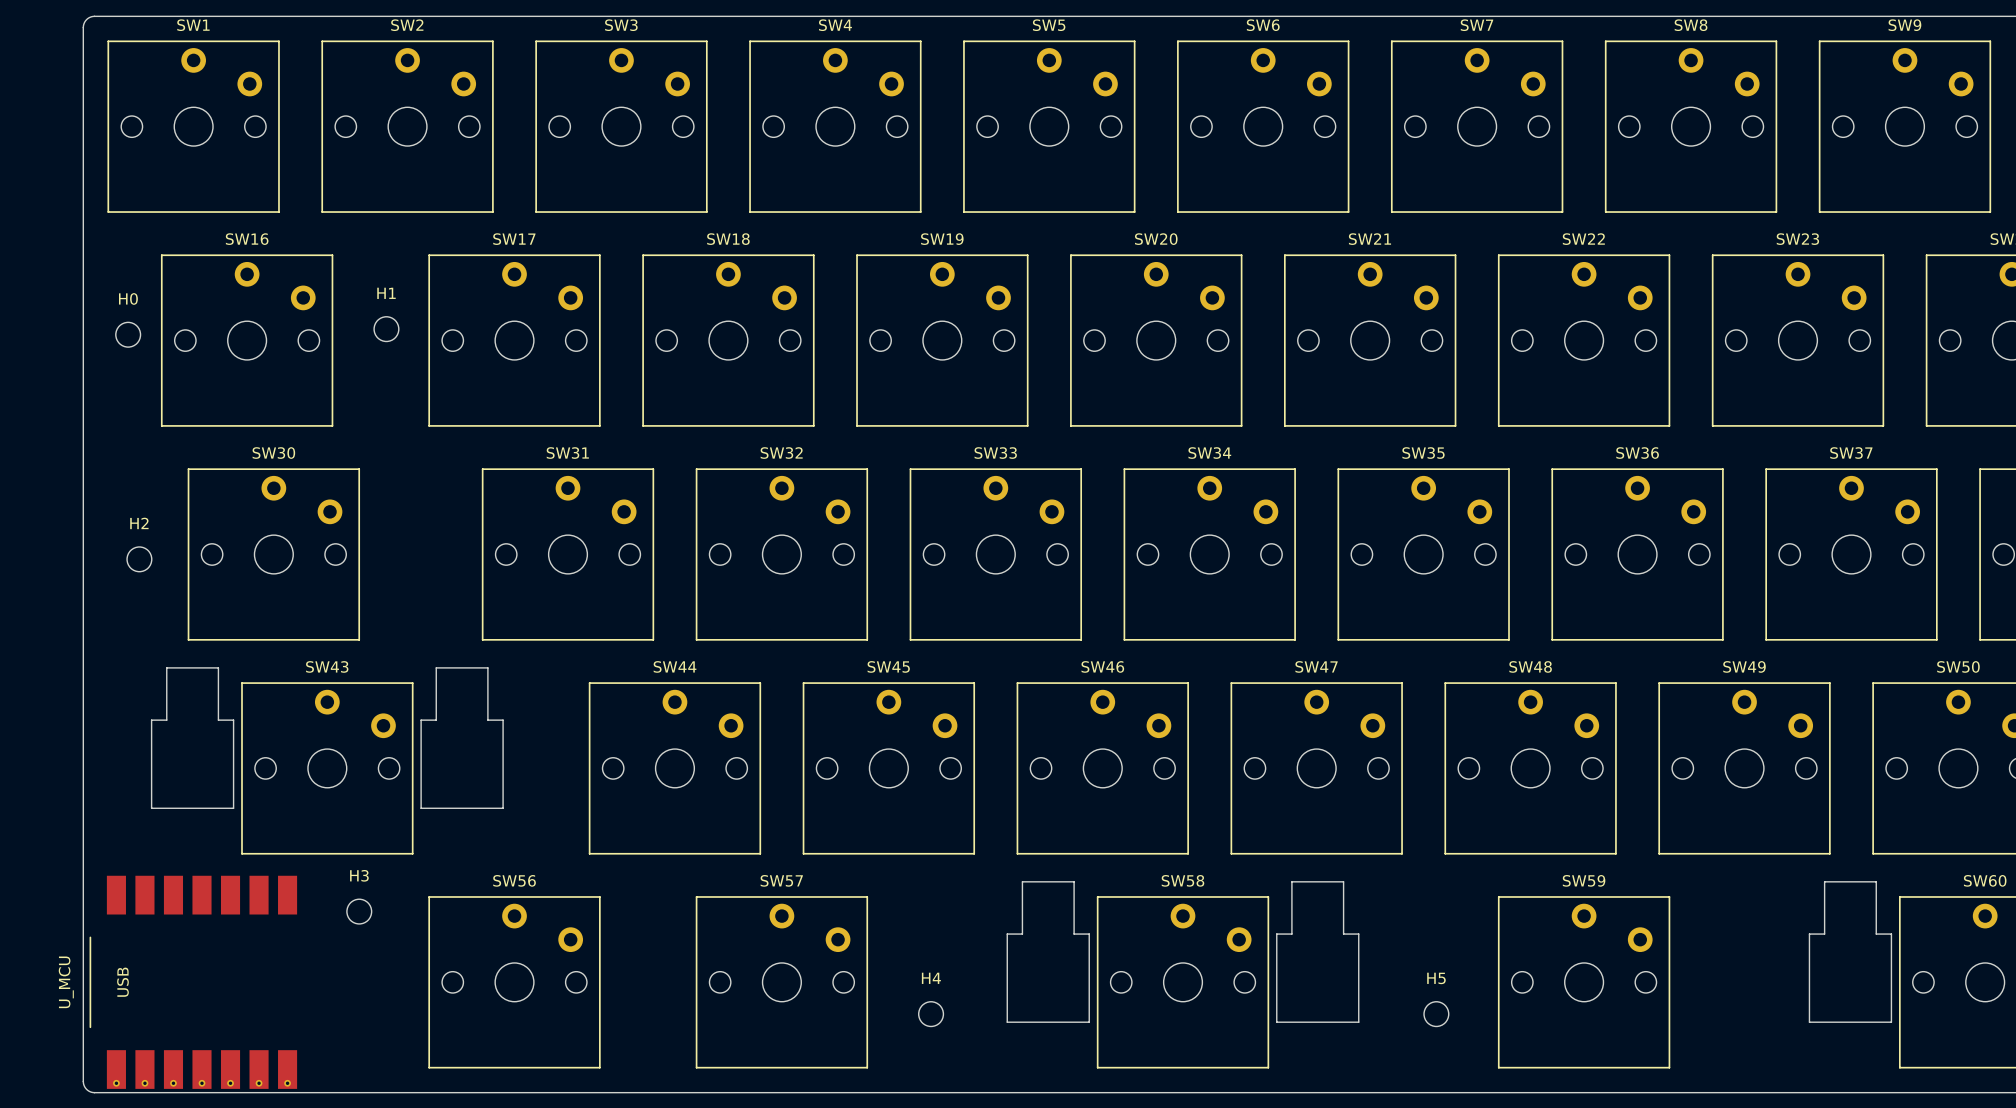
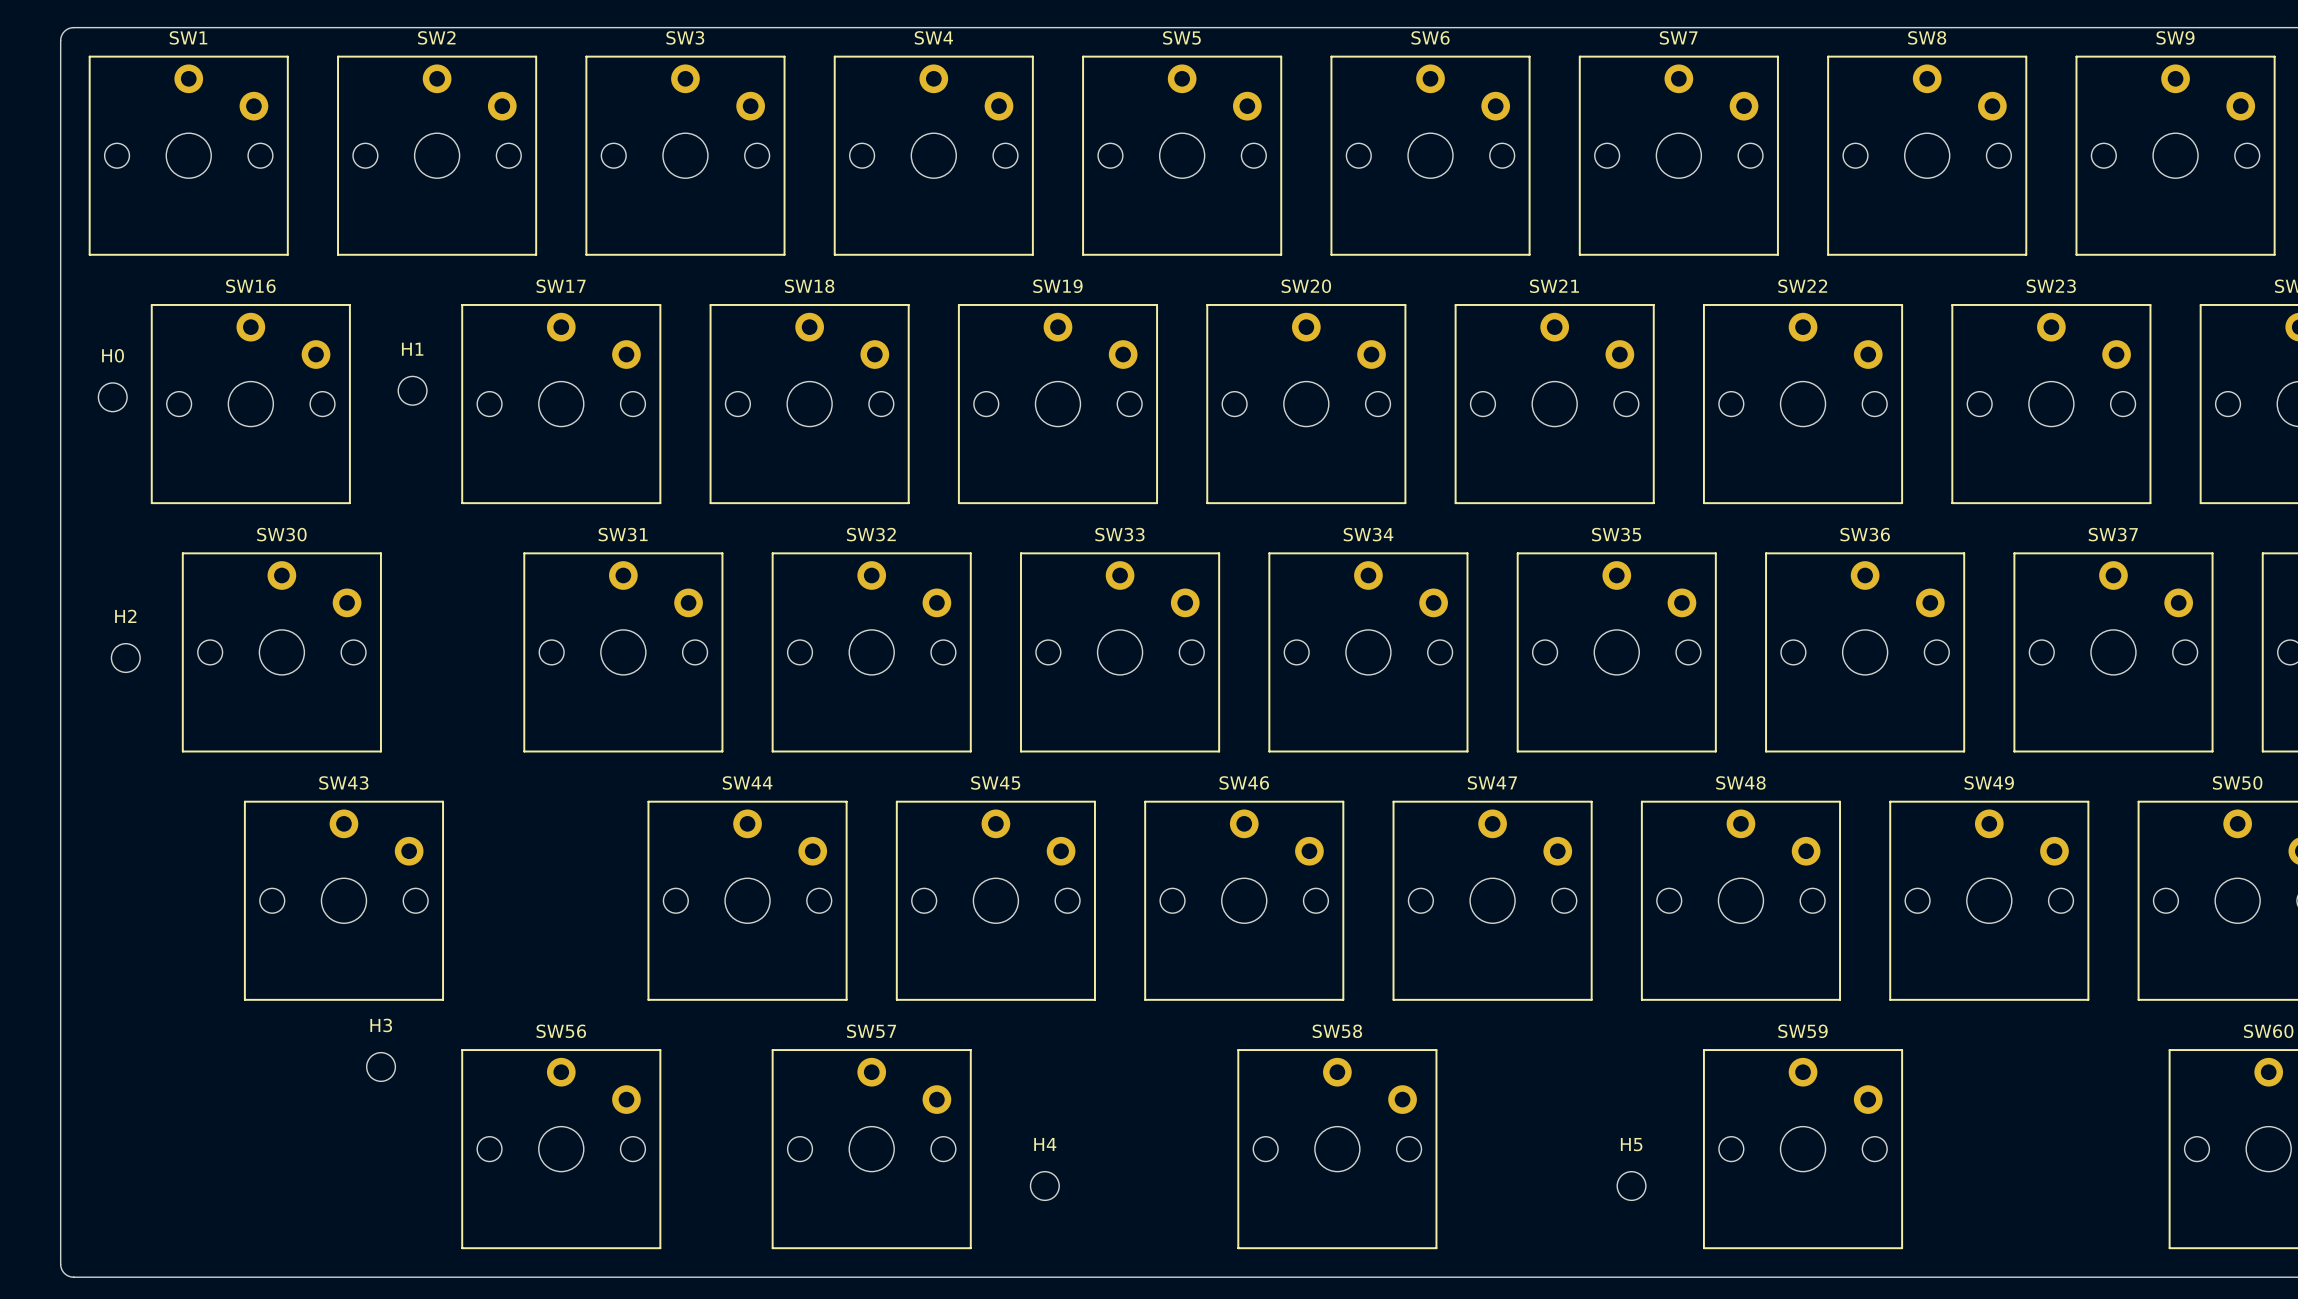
board edge: (166, 667) (166, 720) (151, 720) (151, 808) (233, 808) (233, 720) (218, 720) (218, 667) (166, 667) -> none
board edge: (436, 667) (487, 667) (487, 720) (503, 720) (503, 808) (421, 808) (421, 720) (436, 720) (436, 667) -> none
board edge: (1022, 881) (1022, 934) (1007, 934) (1007, 1022) (1089, 1022) (1089, 934) (1074, 934) (1074, 881) (1022, 881) -> none
board edge: (1291, 881) (1343, 881) (1343, 934) (1358, 934) (1358, 1022) (1276, 1022) (1276, 934) (1291, 934) (1291, 881) -> none
board edge: (1824, 881) (1876, 881) (1876, 934) (1891, 934) (1891, 1022) (1809, 1022) (1809, 934) (1824, 934) (1824, 881) -> none
U_MCU: (193, 982) -> none

